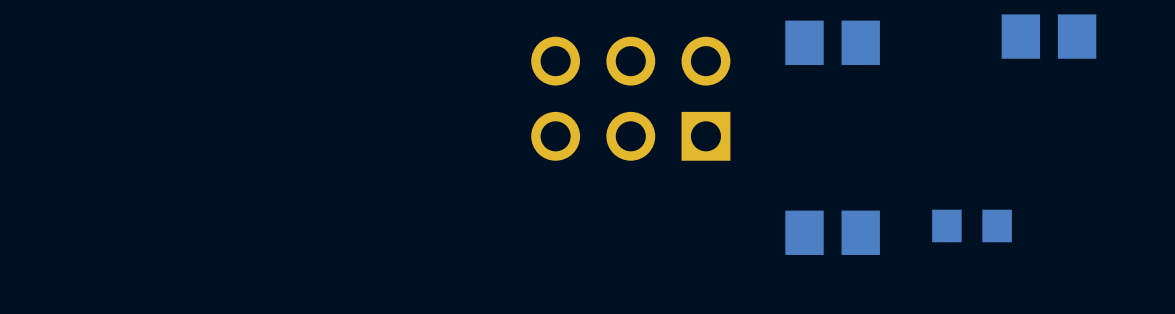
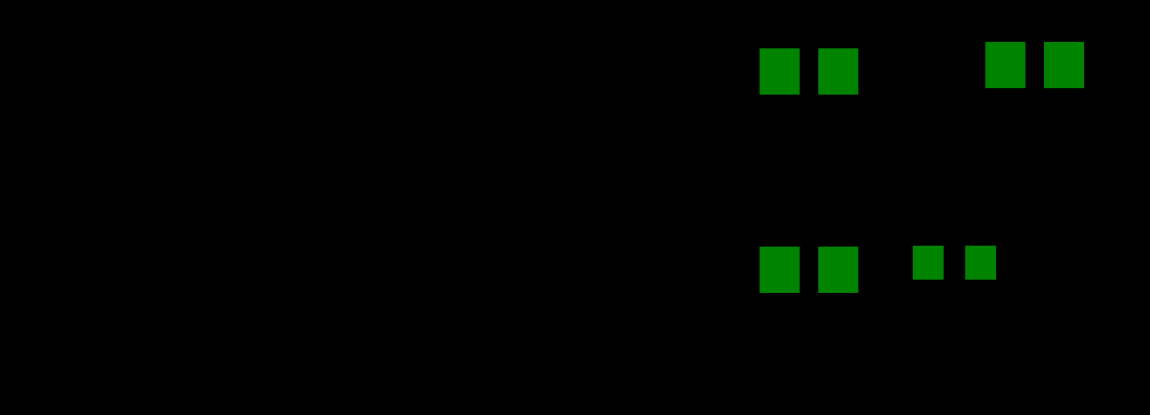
part: (630, 98) -> none

